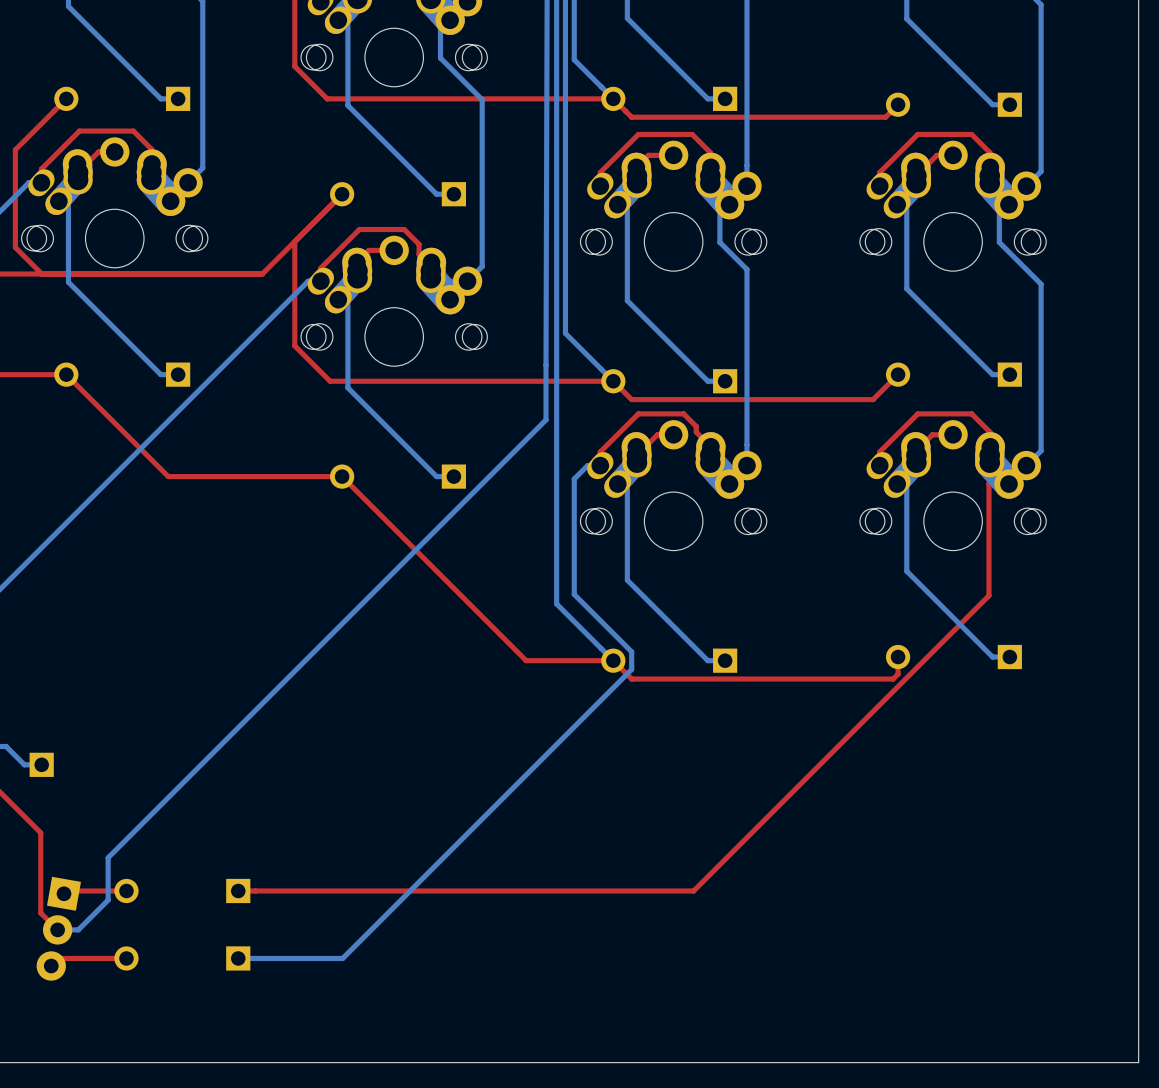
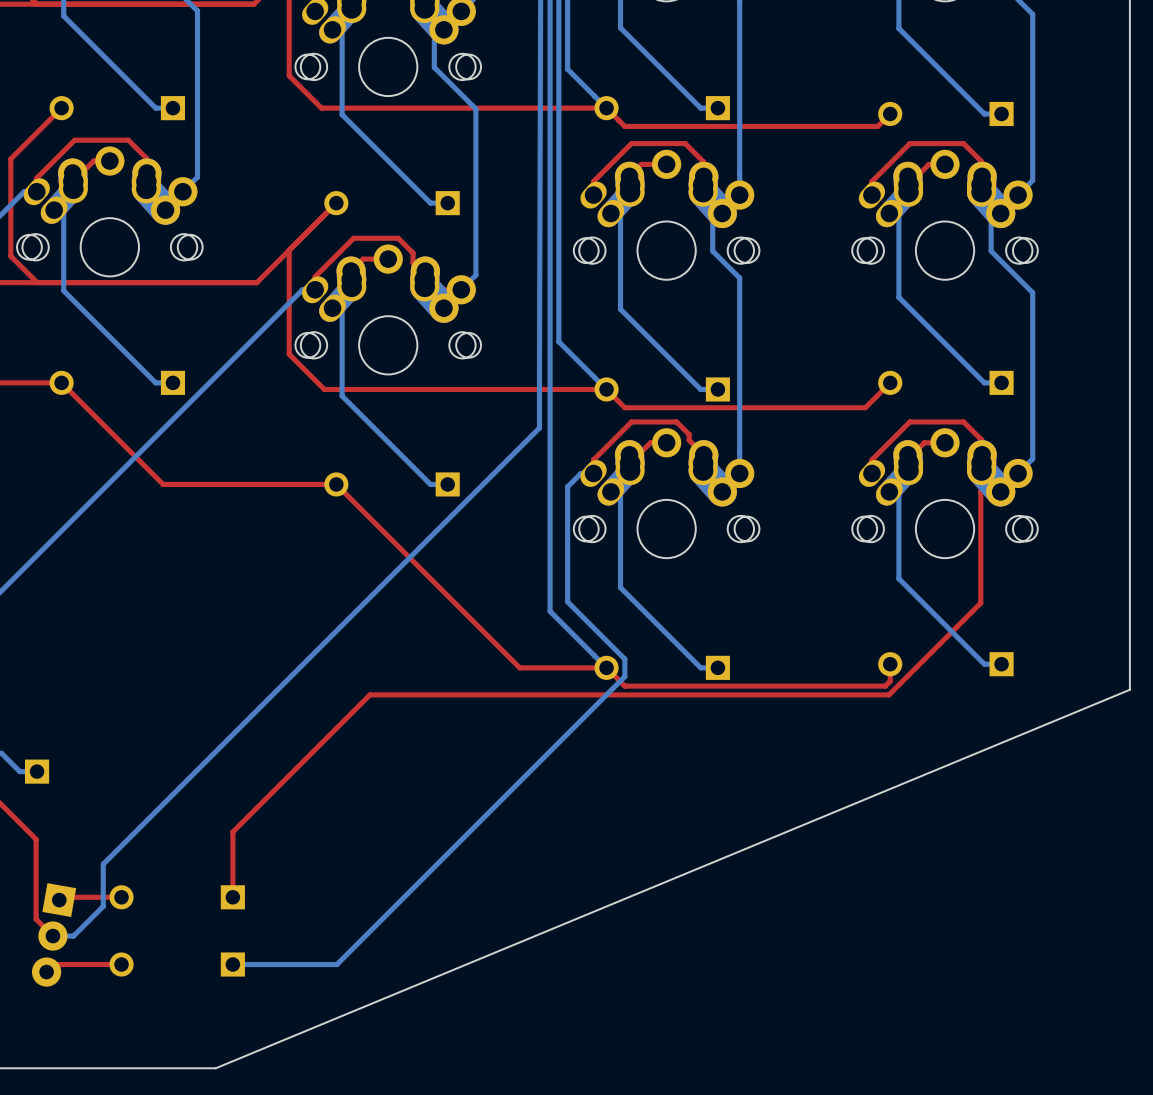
board edge: (1138, 682) (1138, 1062) (221, 1062) -> (1129, 689) (215, 1068)
top track: (896, 687) (693, 890) (238, 890) -> (888, 694) (369, 694) (232, 831) (232, 897)

